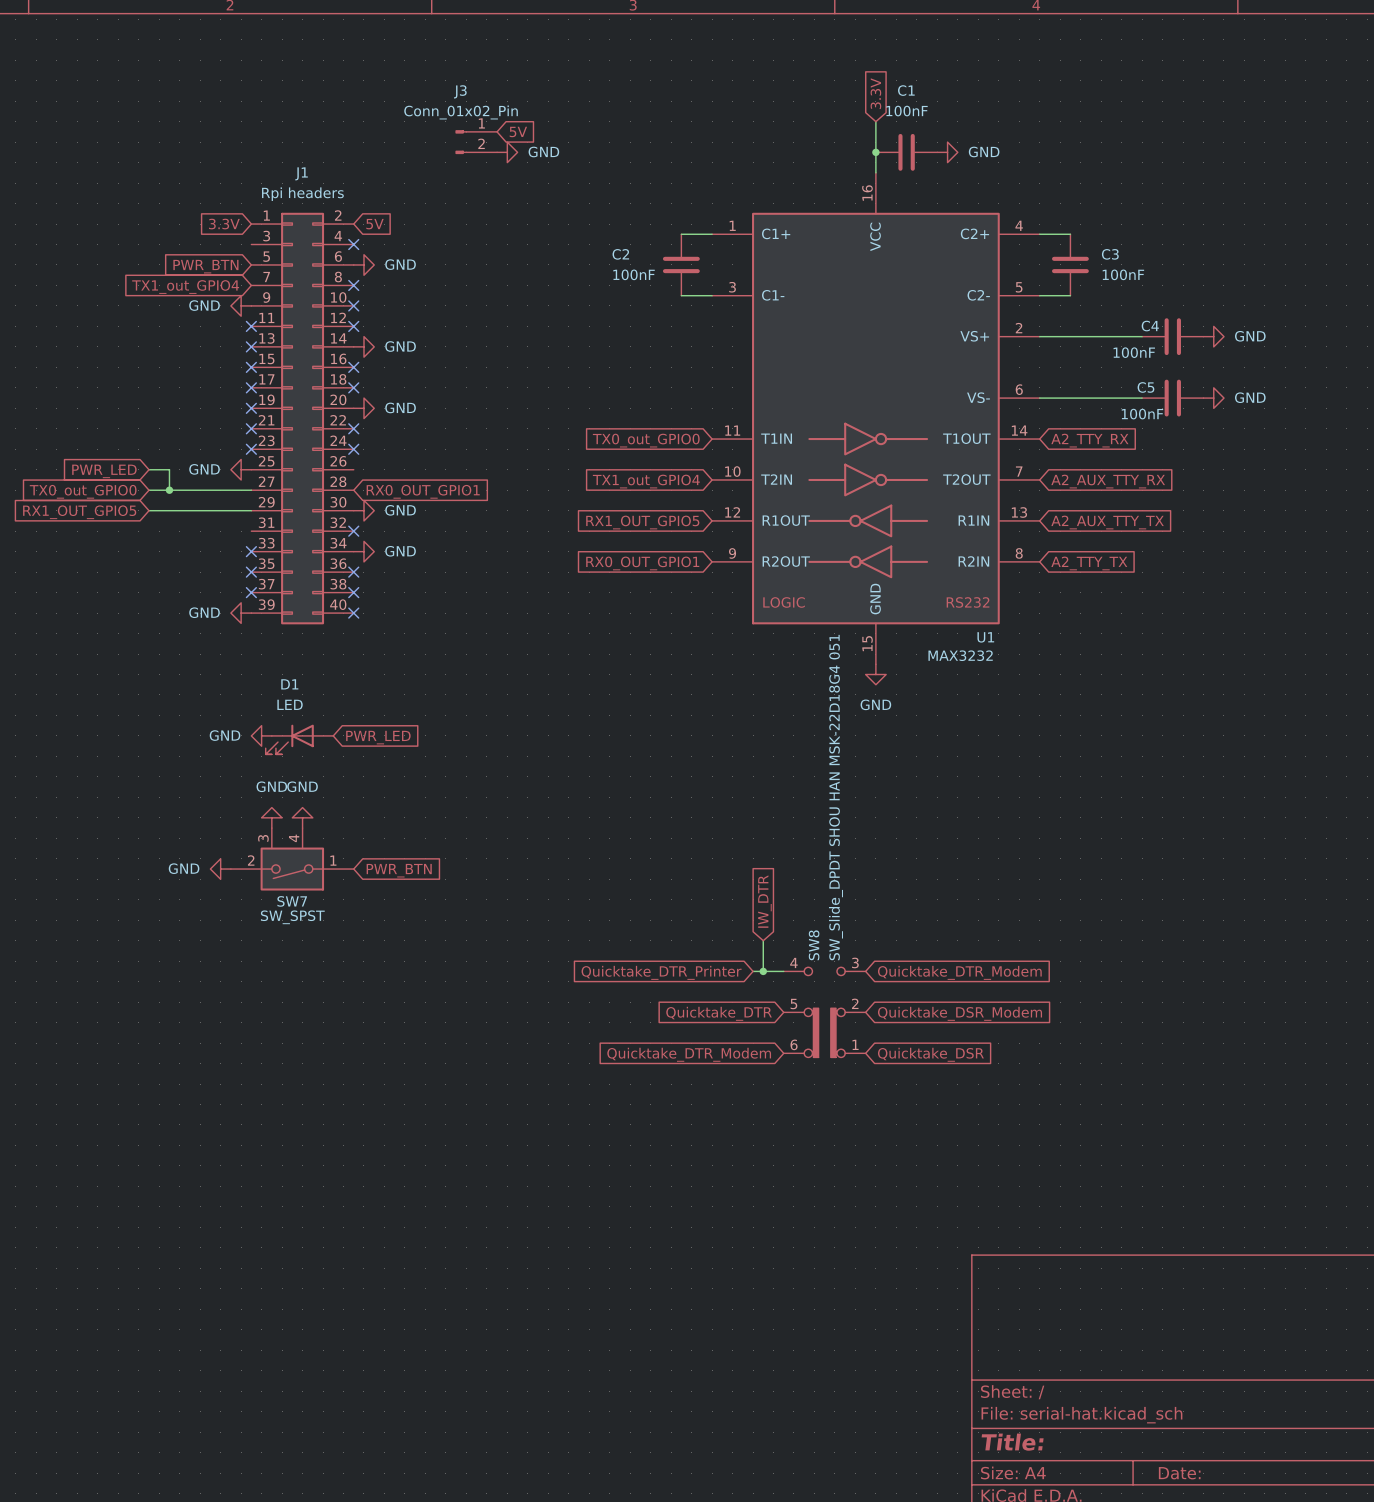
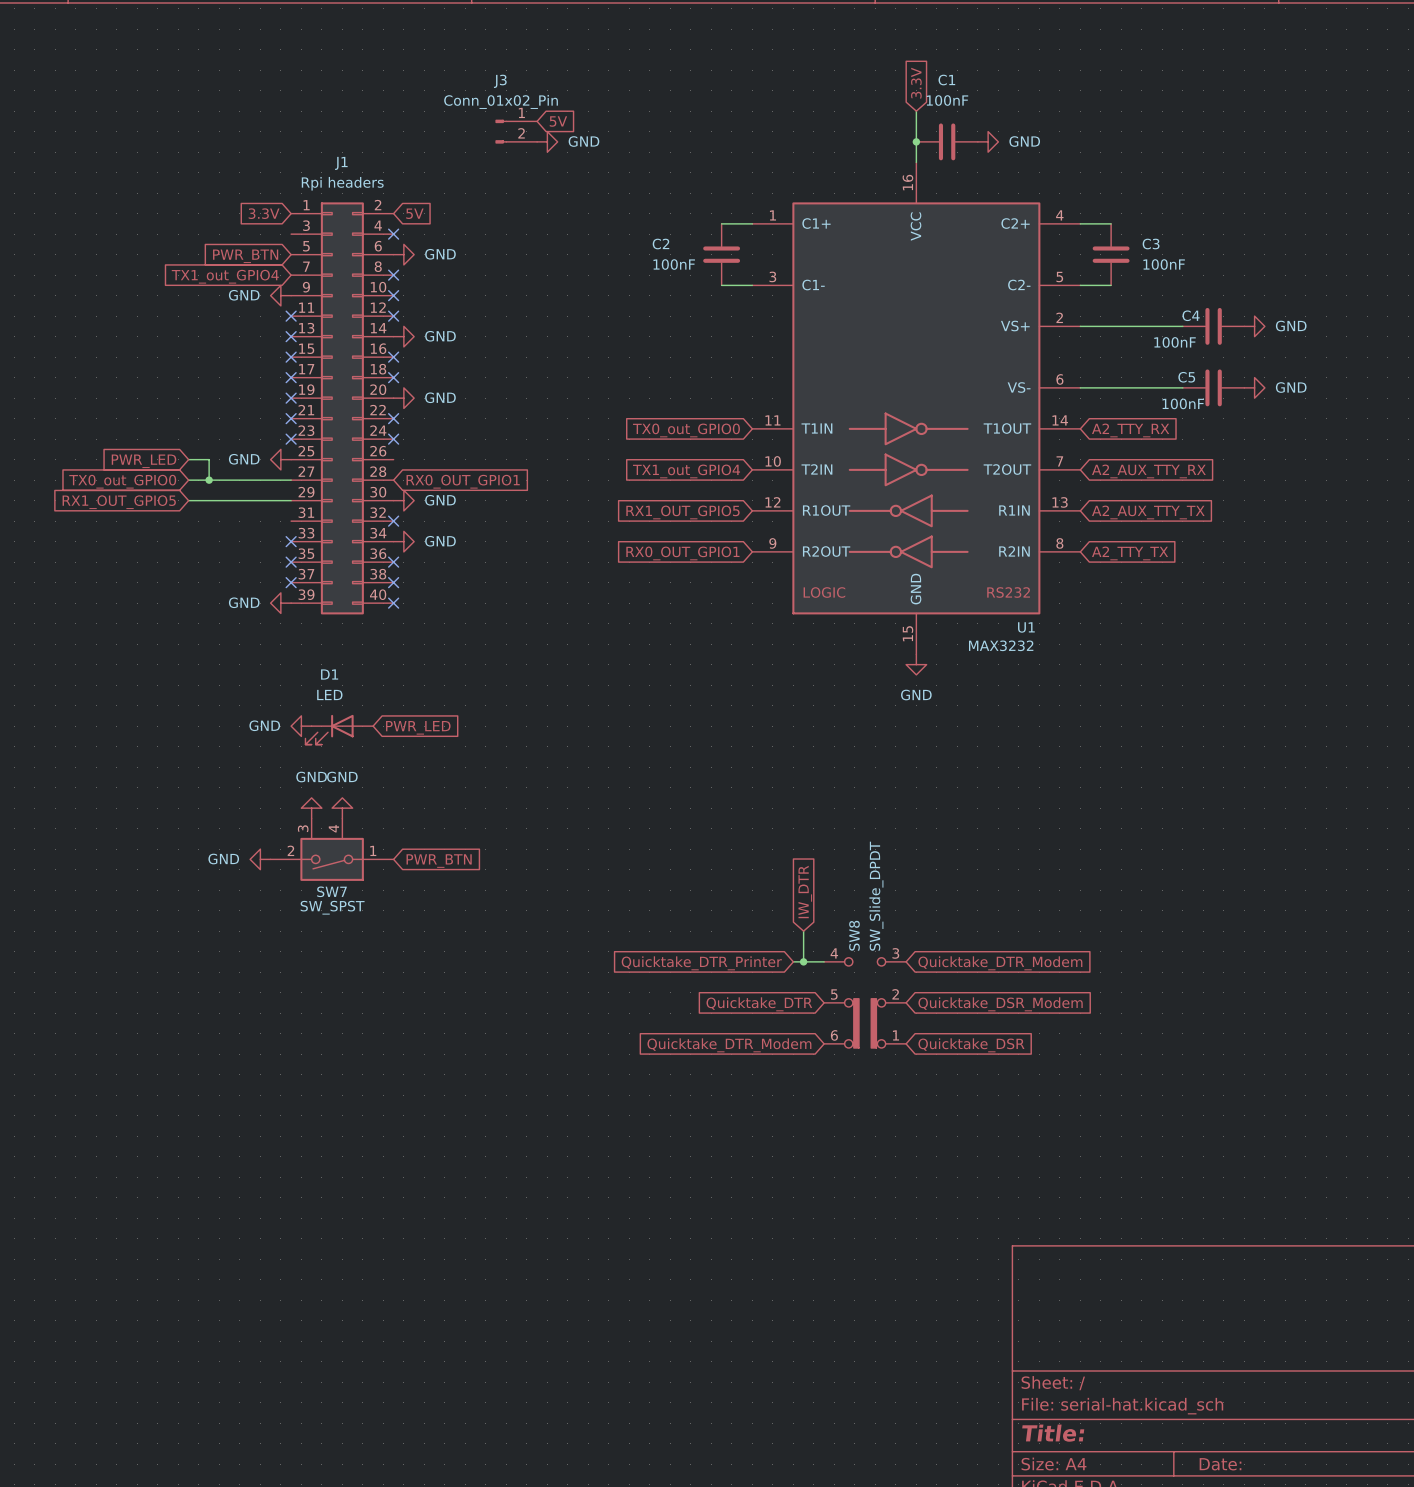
SW8 value: SW_Slide_DPDT SHOU HAN MSK-22D18G4 051 (836, 797) -> SW_Slide_DPDT (876, 896)

